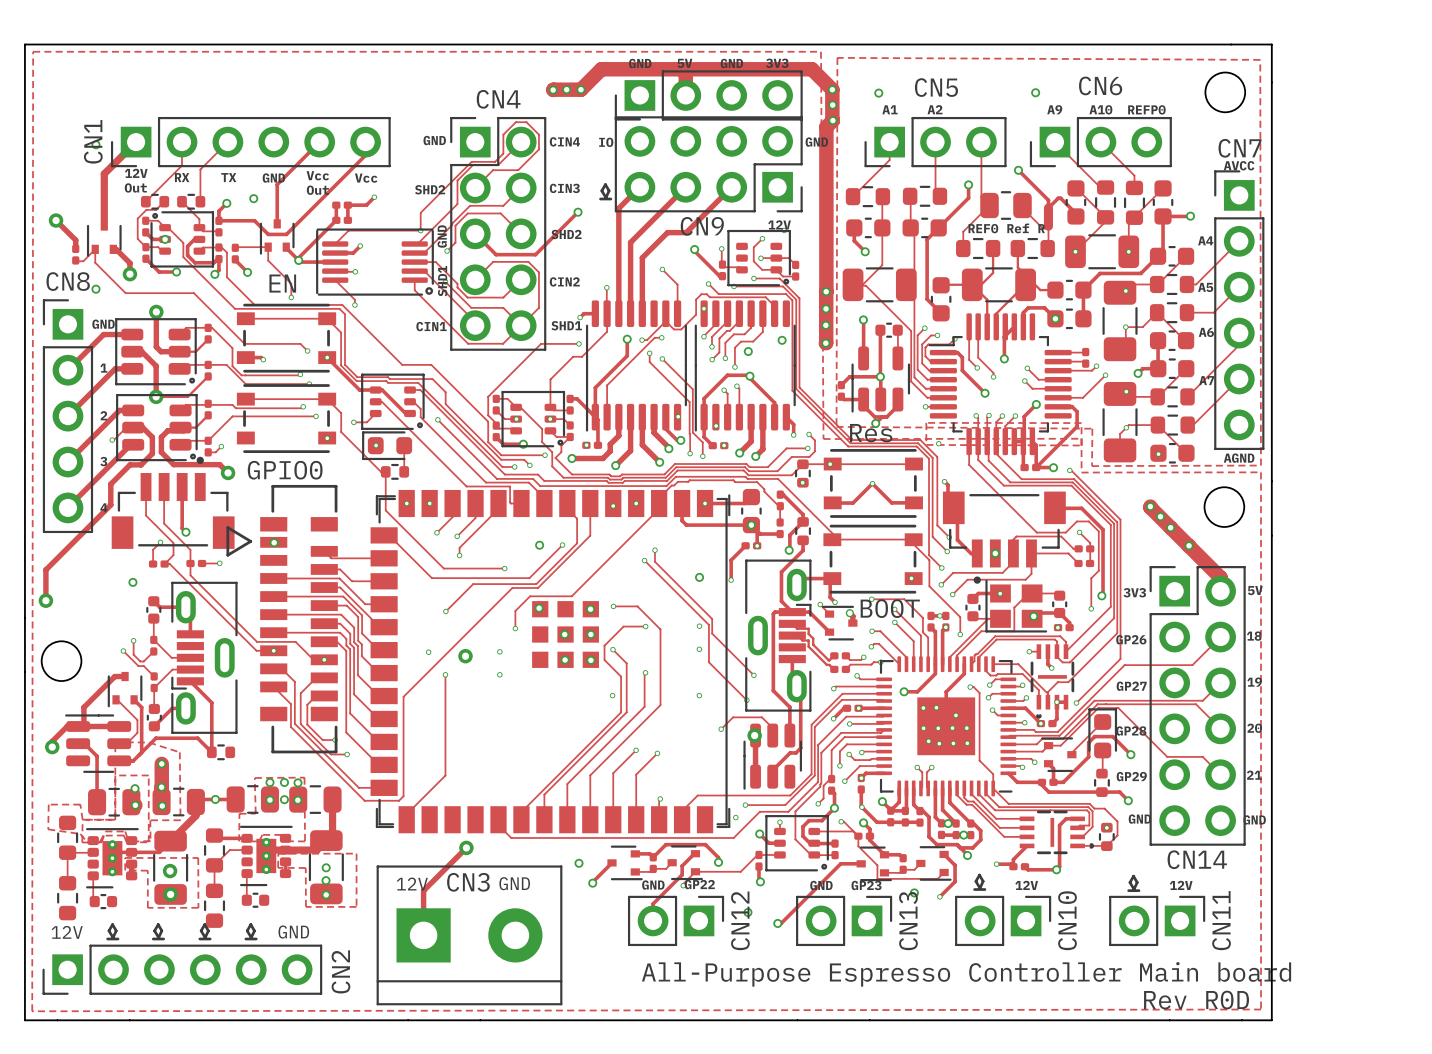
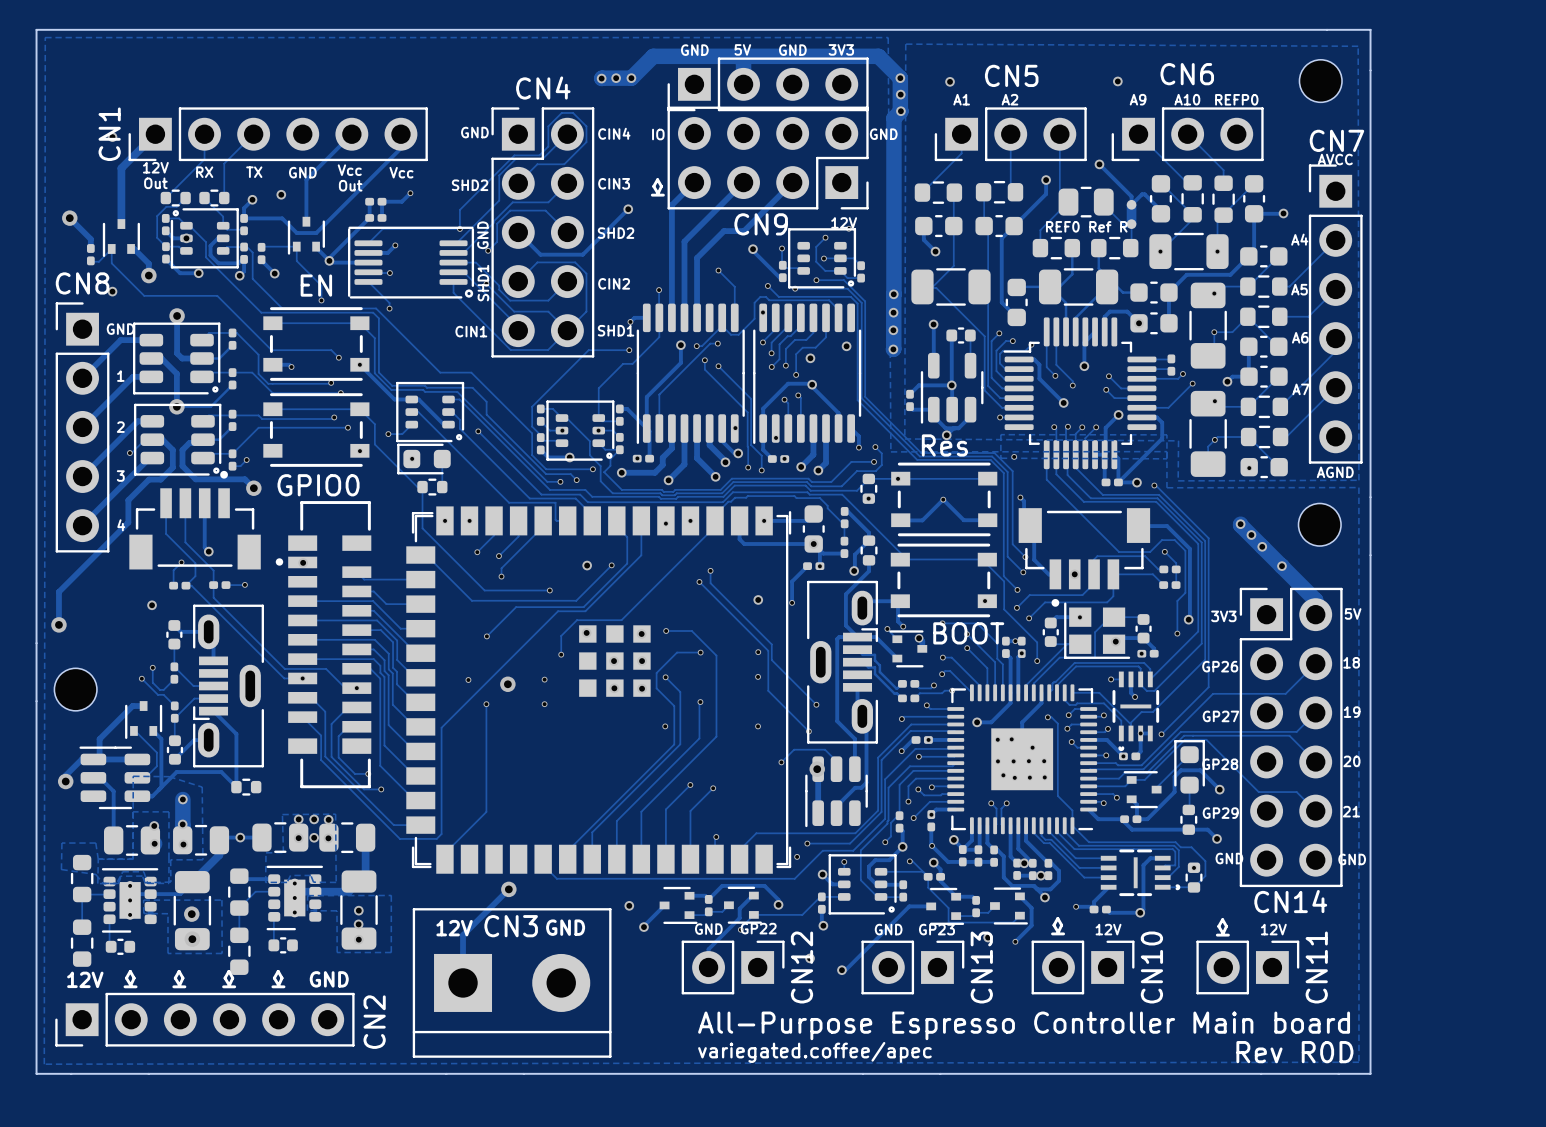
part footprint: [226, 484, 338, 754] -> [275, 501, 372, 789]
text: none -> variegated.coffee/apec (814, 1052)

